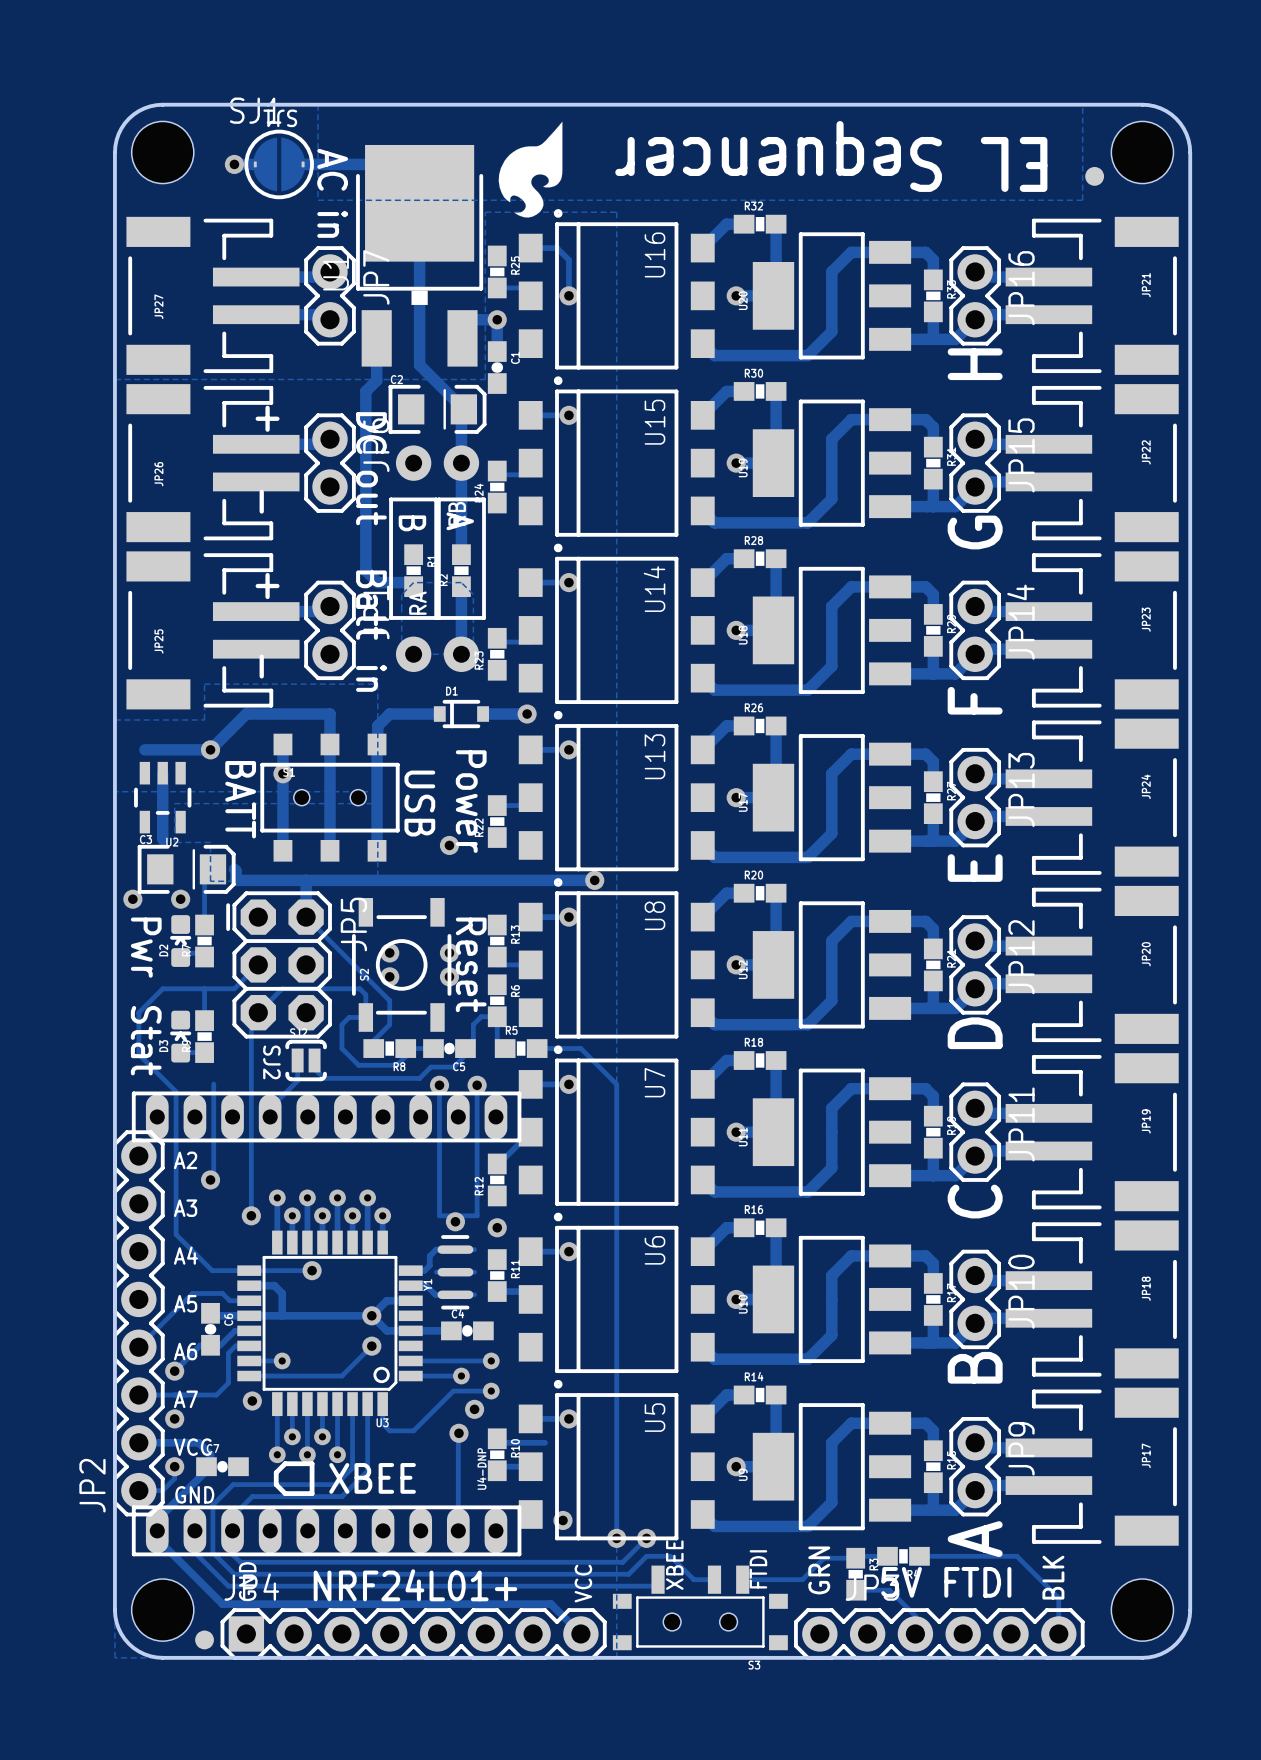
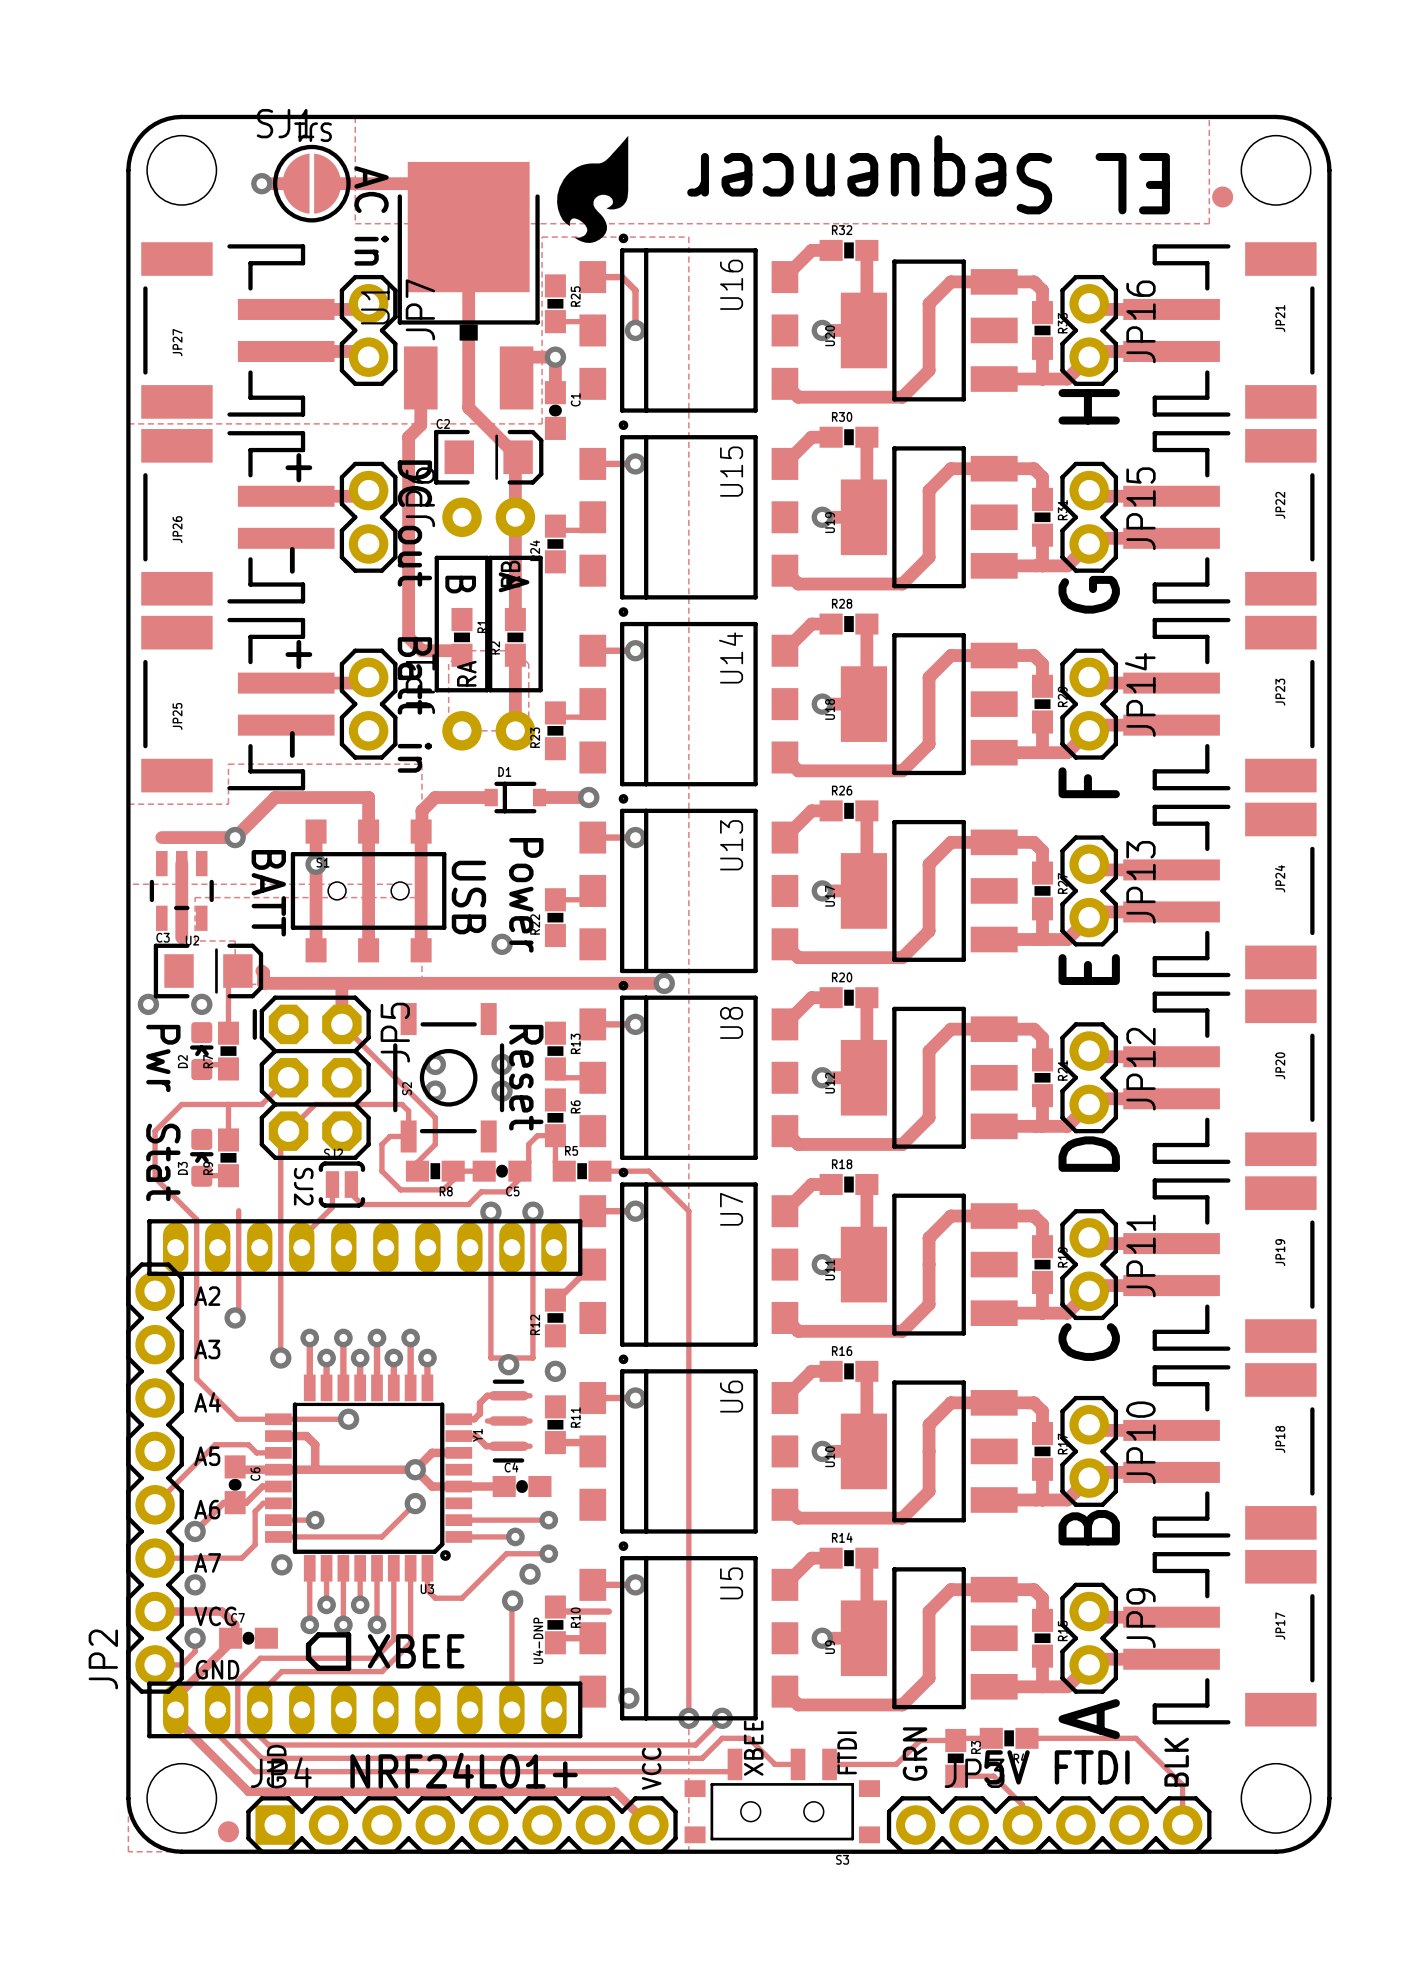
U3 footprint: [237, 1230, 423, 1417] -> [265, 1374, 473, 1582]

